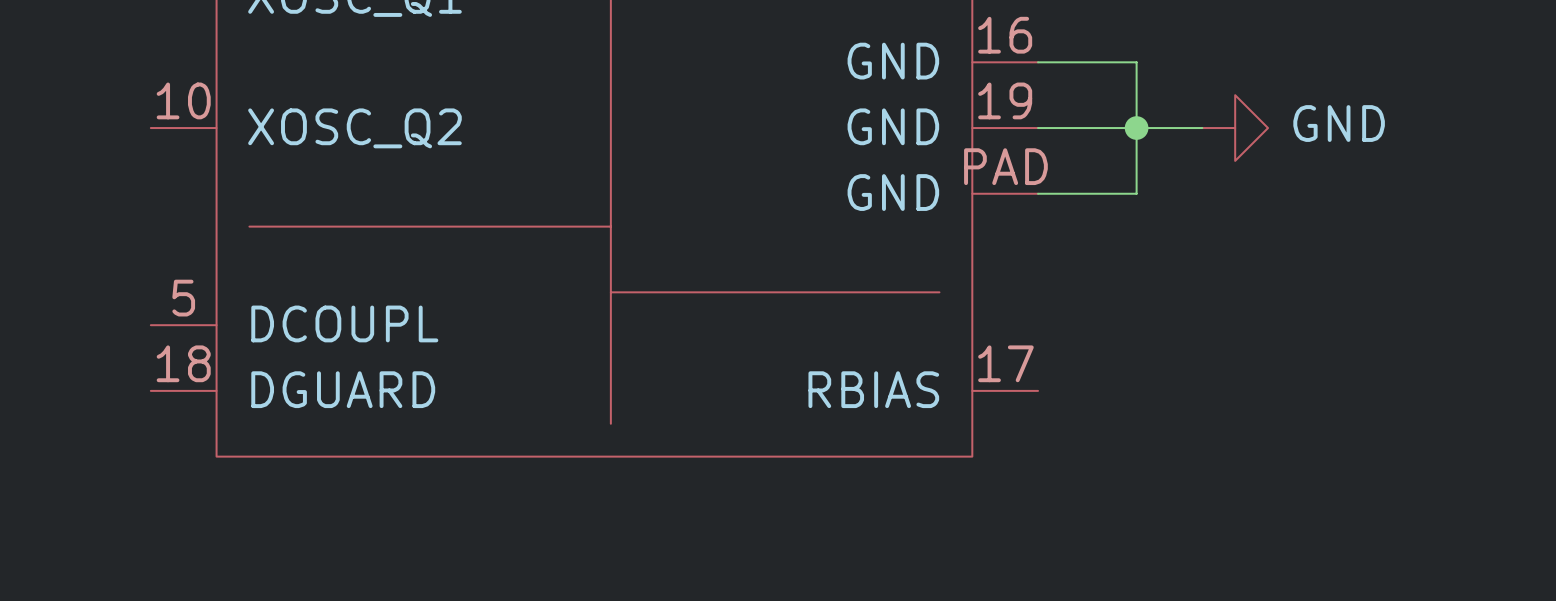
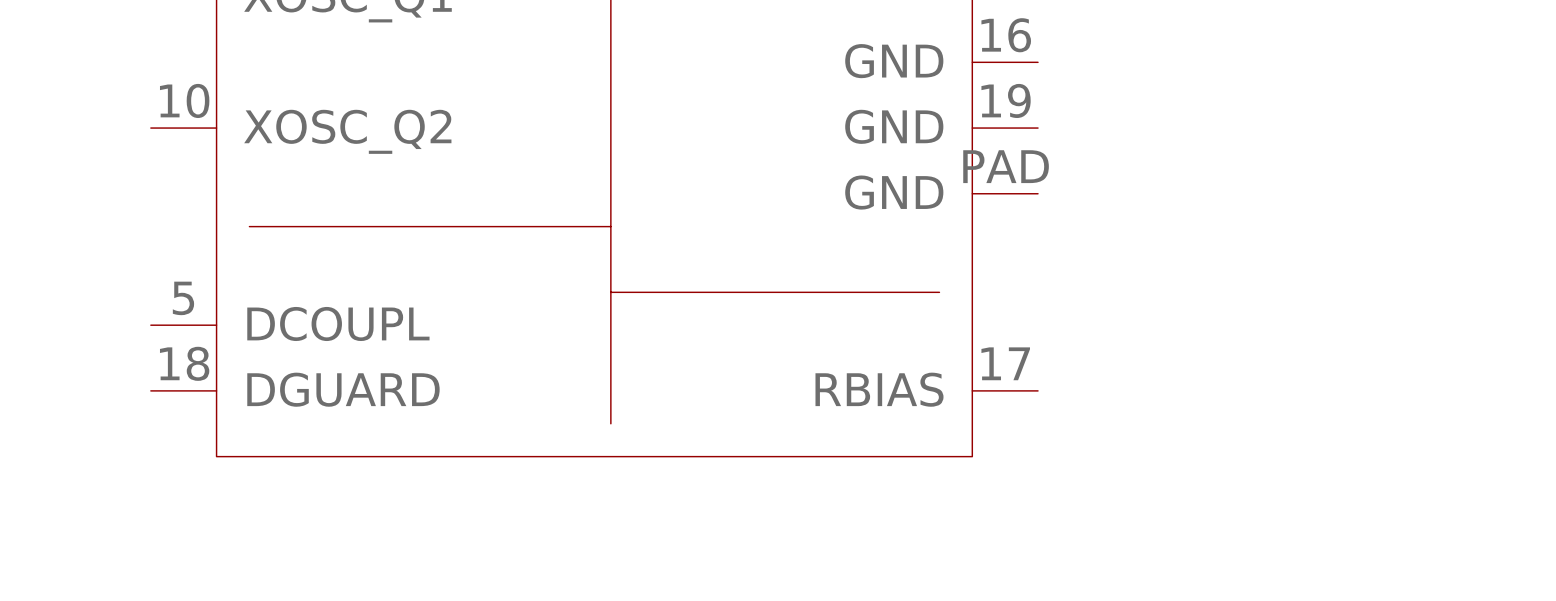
wire: (1038, 62) (1136, 62) (1136, 193) (1038, 193) -> none
wire: (1038, 128) (1202, 128) -> none
junction: (1136, 128) -> none
power symbol: GND (1235, 128) -> none

